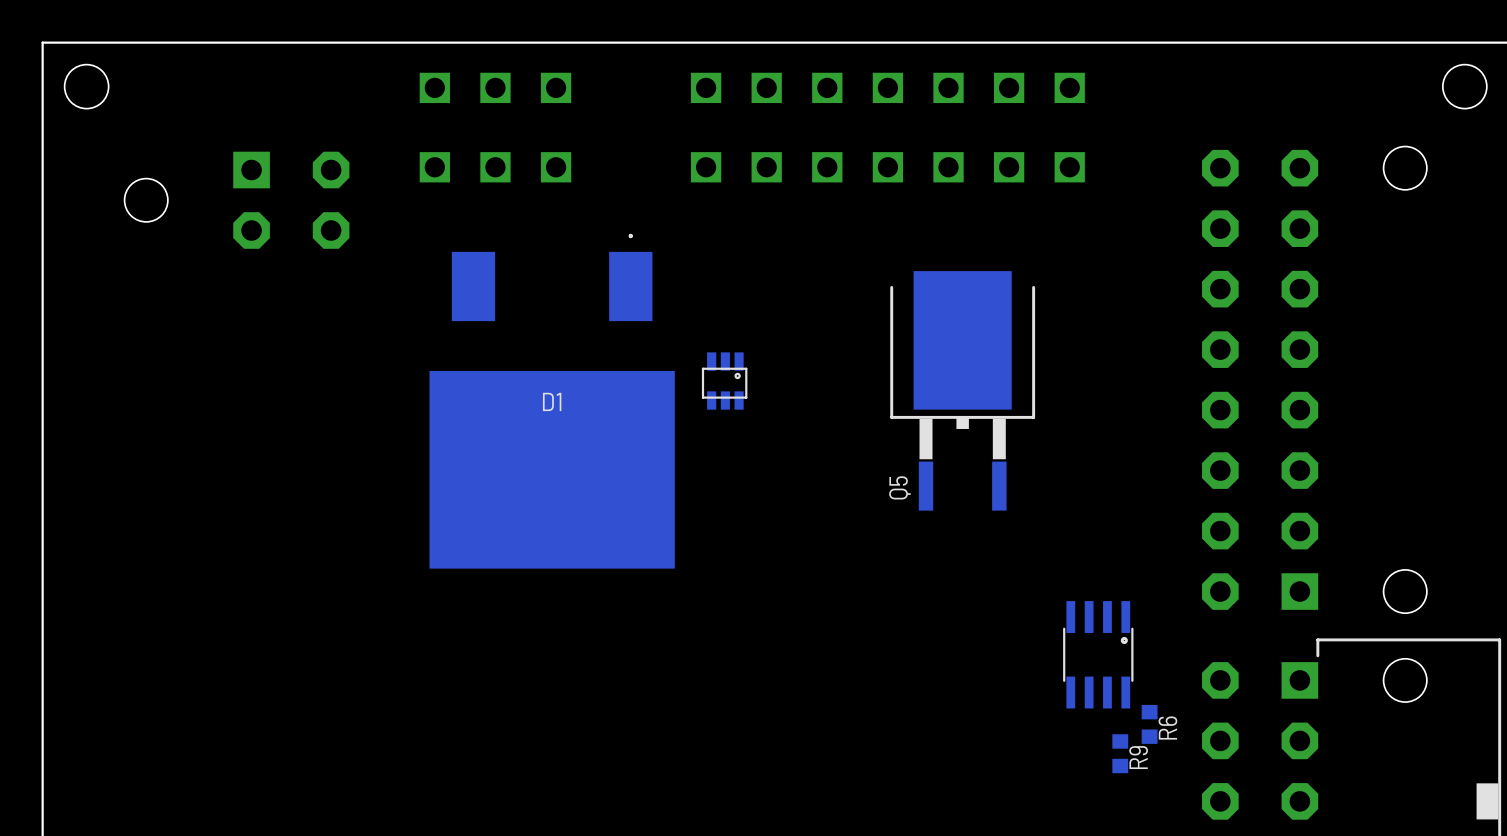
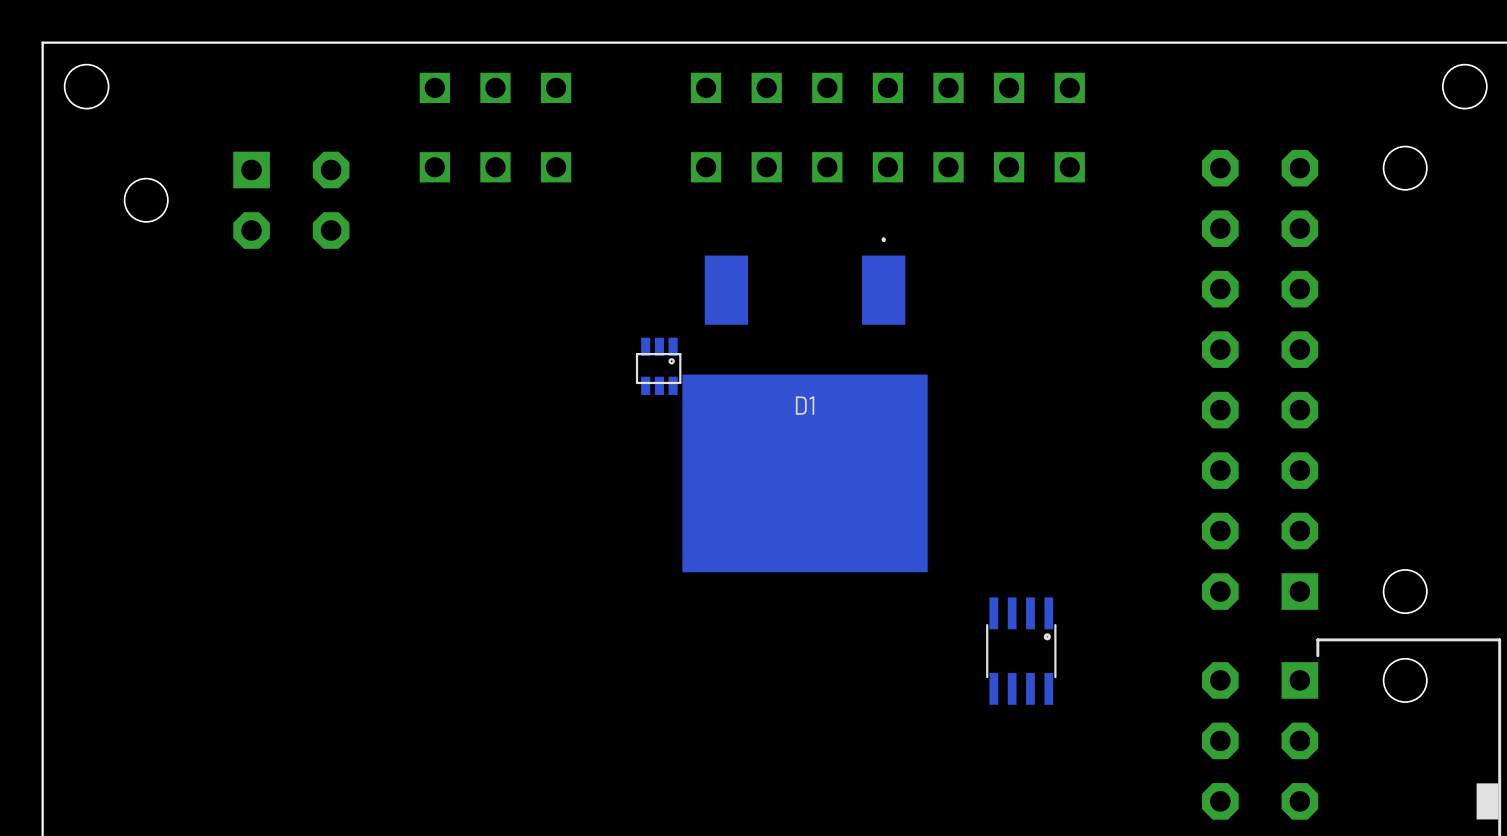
part position: (724, 381) -> (658, 366)
Q5: (962, 390) -> none
D1 position: (552, 401) -> (805, 404)
part position: (1098, 654) -> (1021, 651)
R6: (1149, 724) -> none
R9: (1120, 753) -> none

